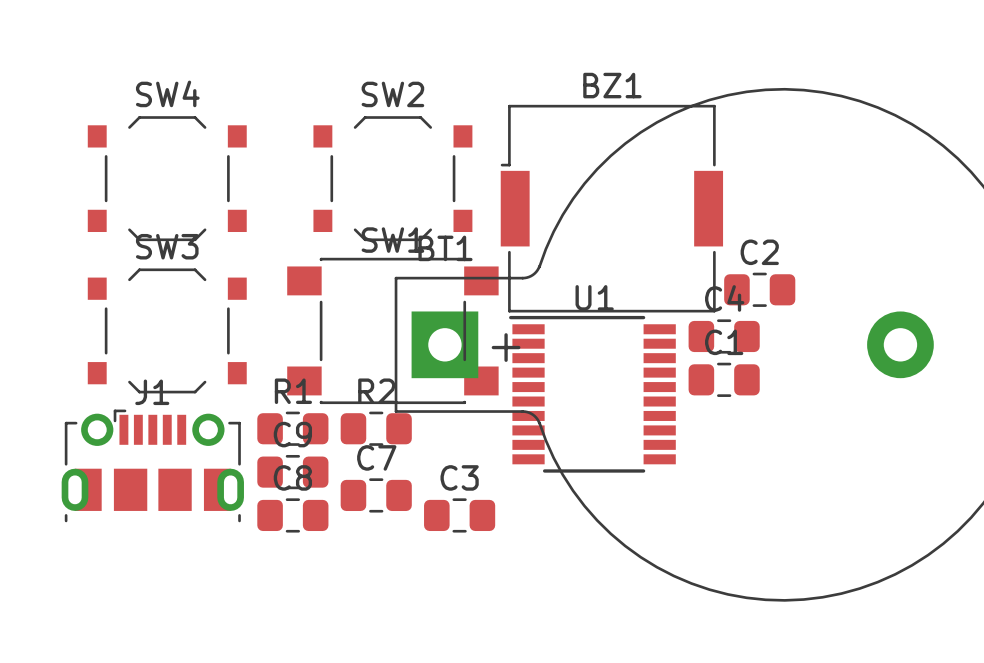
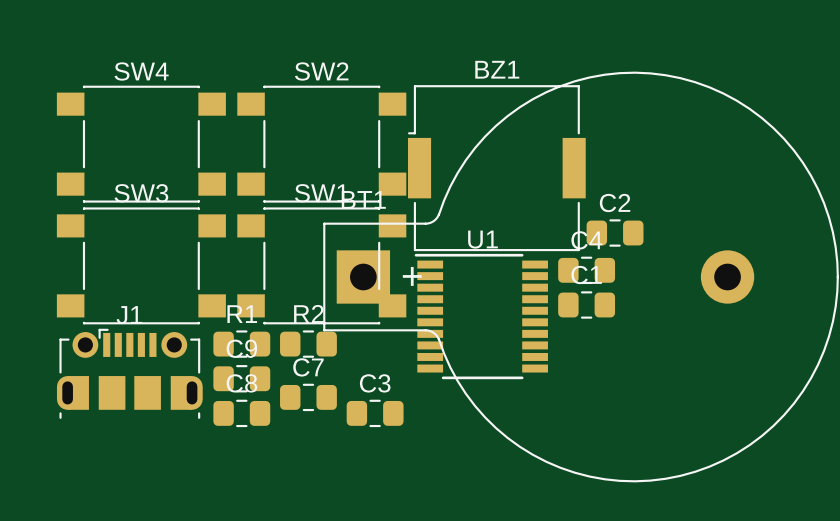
SW4 footprint: [87, 116, 247, 242] -> [56, 85, 226, 203]
SW2 footprint: [313, 116, 473, 242] -> [237, 85, 407, 203]
SW3 footprint: [87, 268, 247, 394] -> [56, 207, 226, 325]

